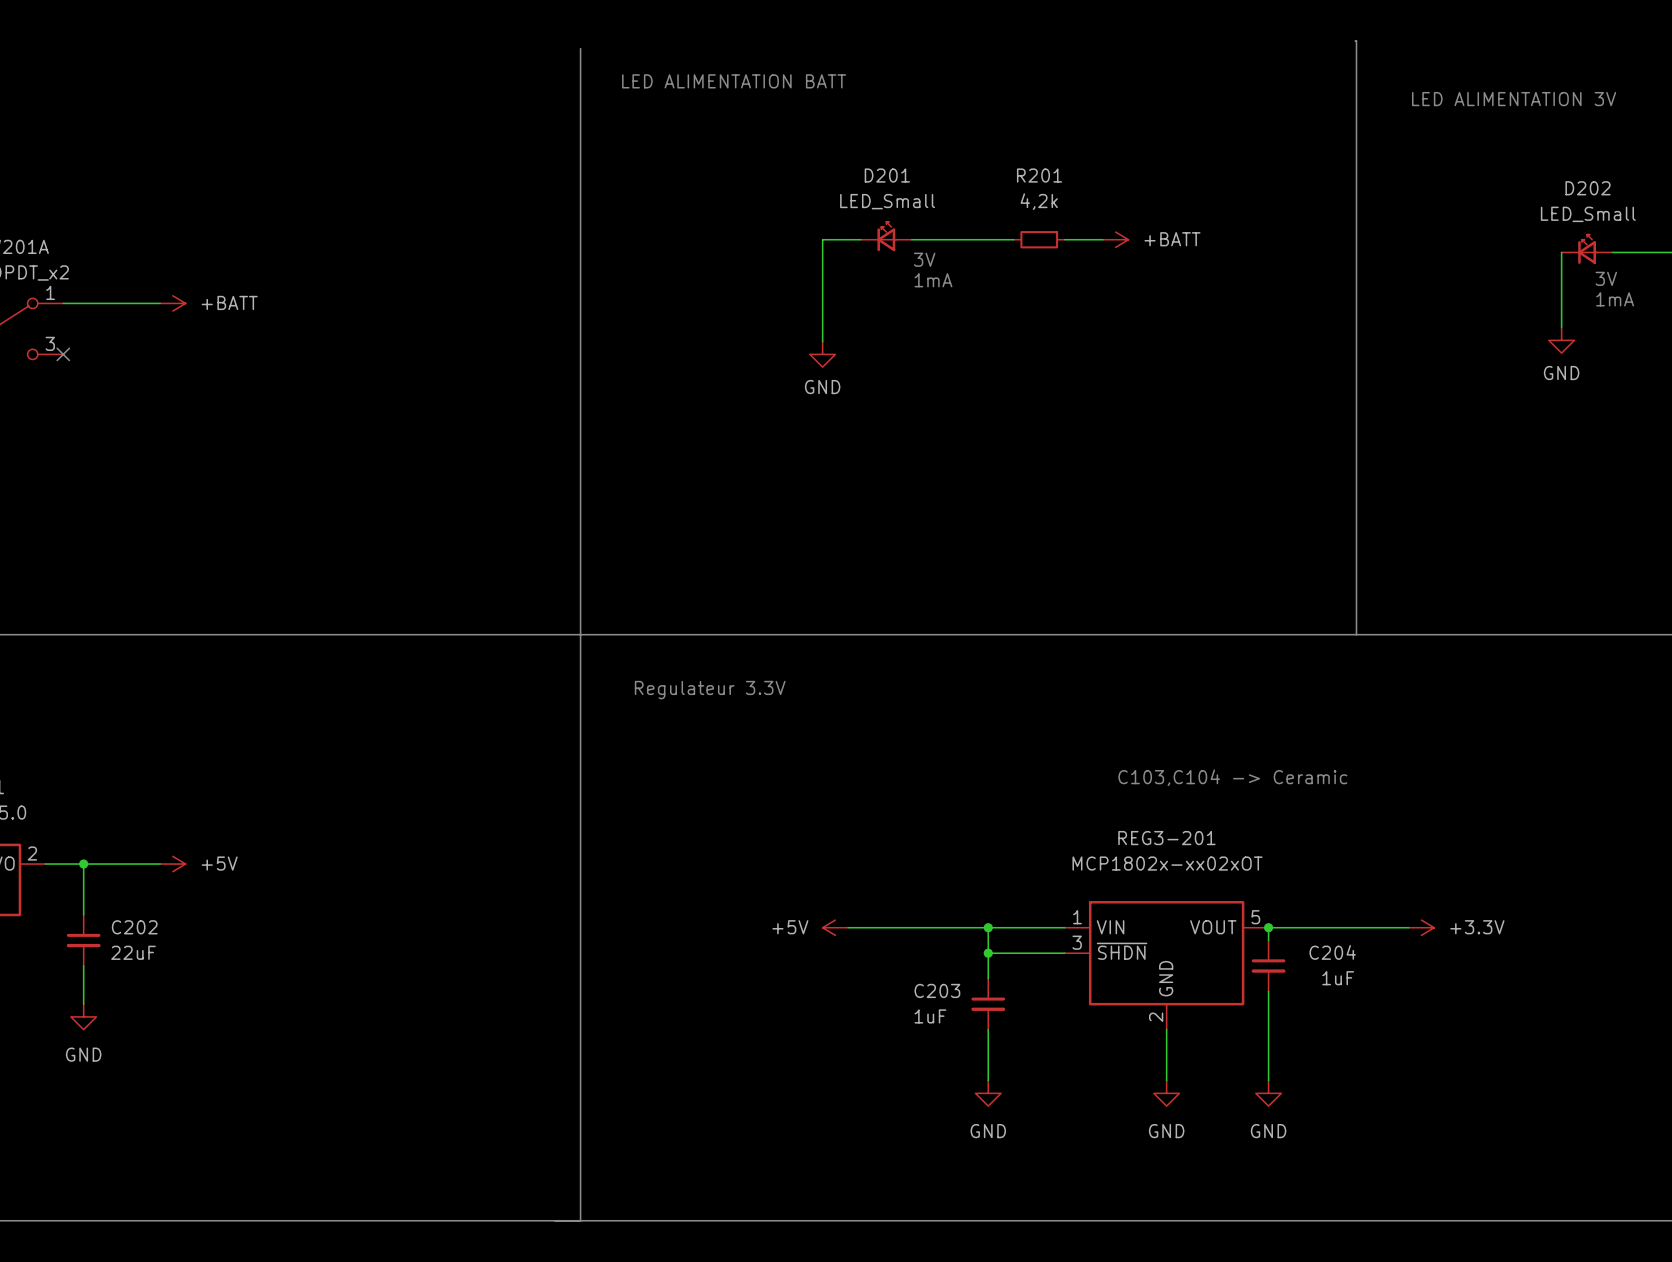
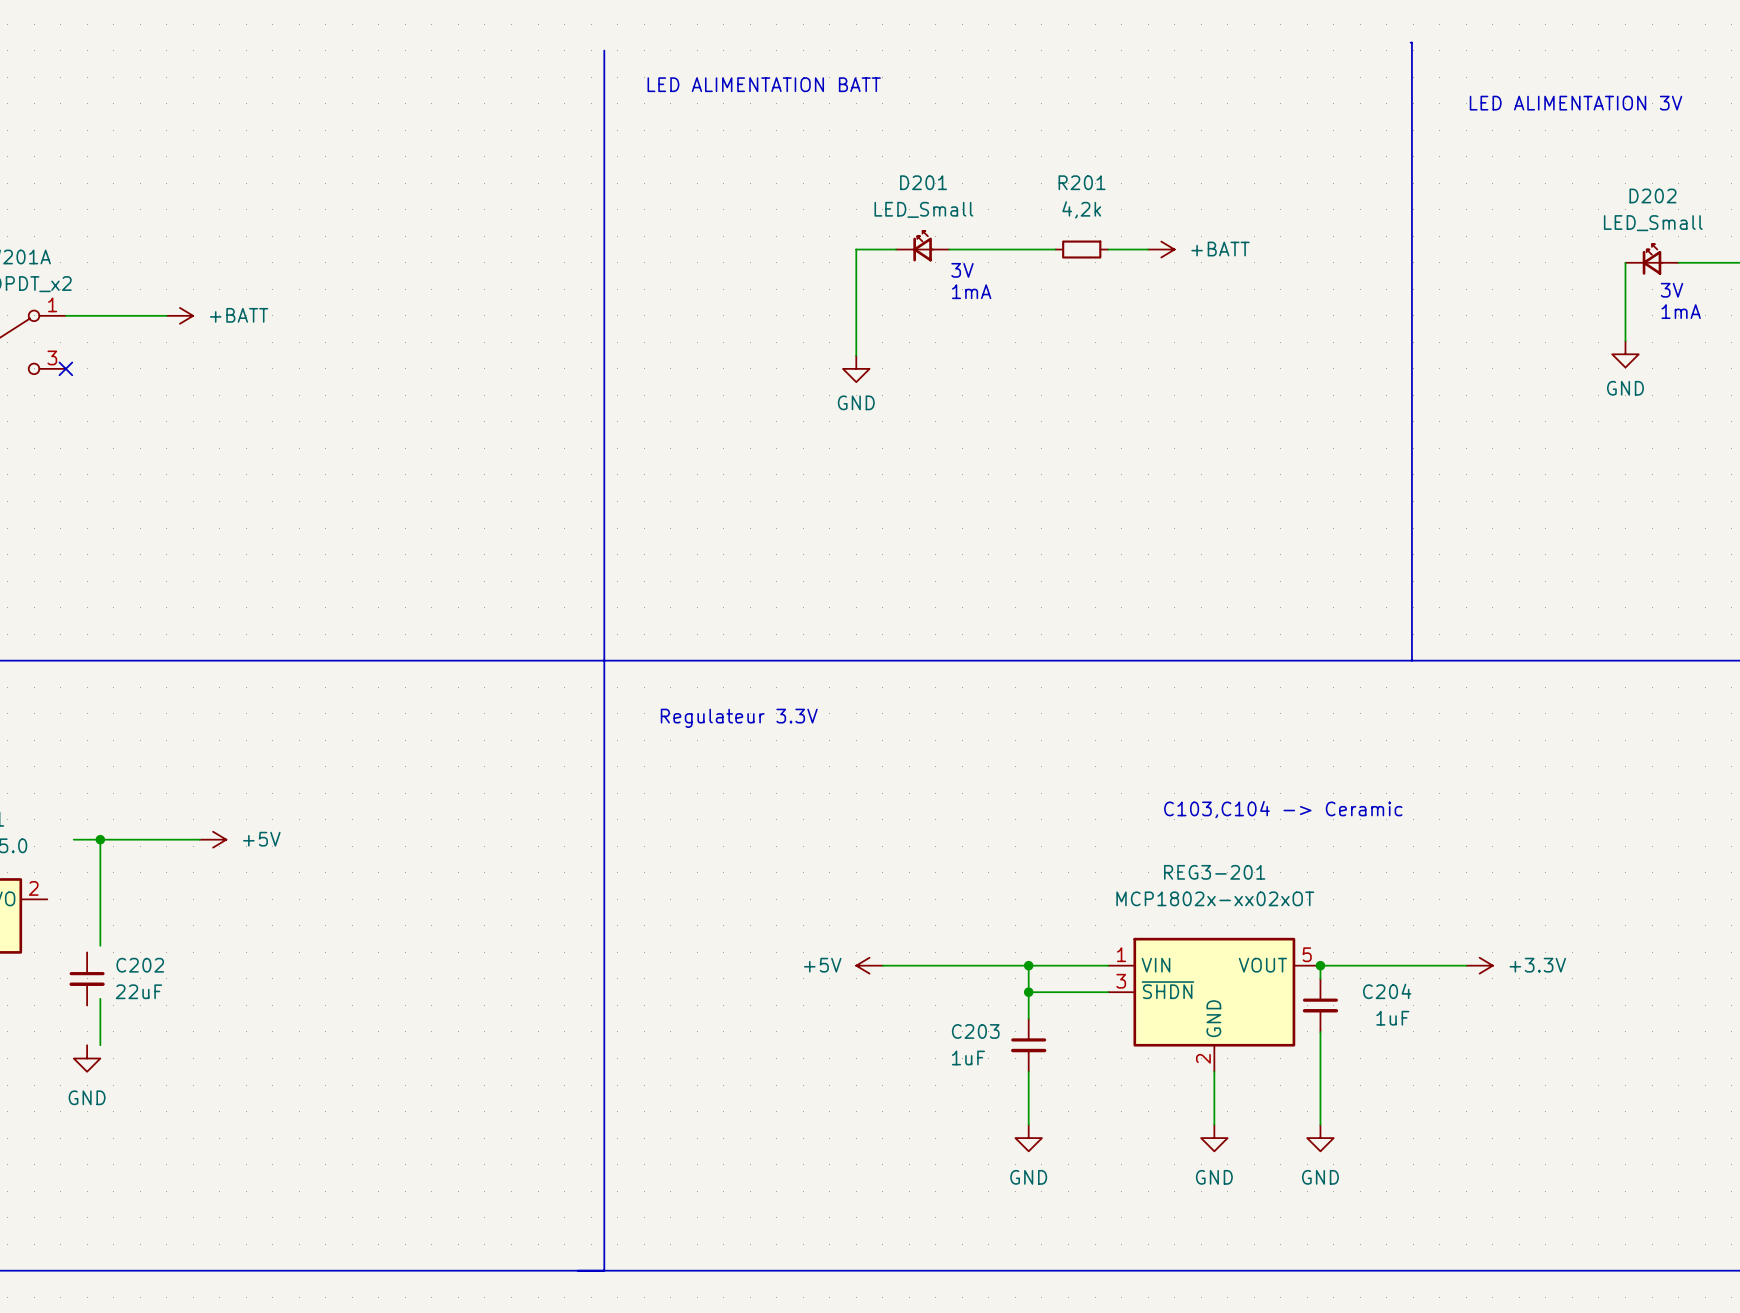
wire: none -> (73, 839) (199, 839)
wire: none -> (100, 839) (100, 945)
wire: (45, 864) (160, 864) -> none
wire: (83, 864) (83, 914) -> none
junction position: (83, 864) -> (100, 839)
power symbol position: +5V (172, 864) -> +5V (213, 839)
wire: none -> (100, 998) (100, 1045)
wire: (83, 965) (83, 1004) -> none

